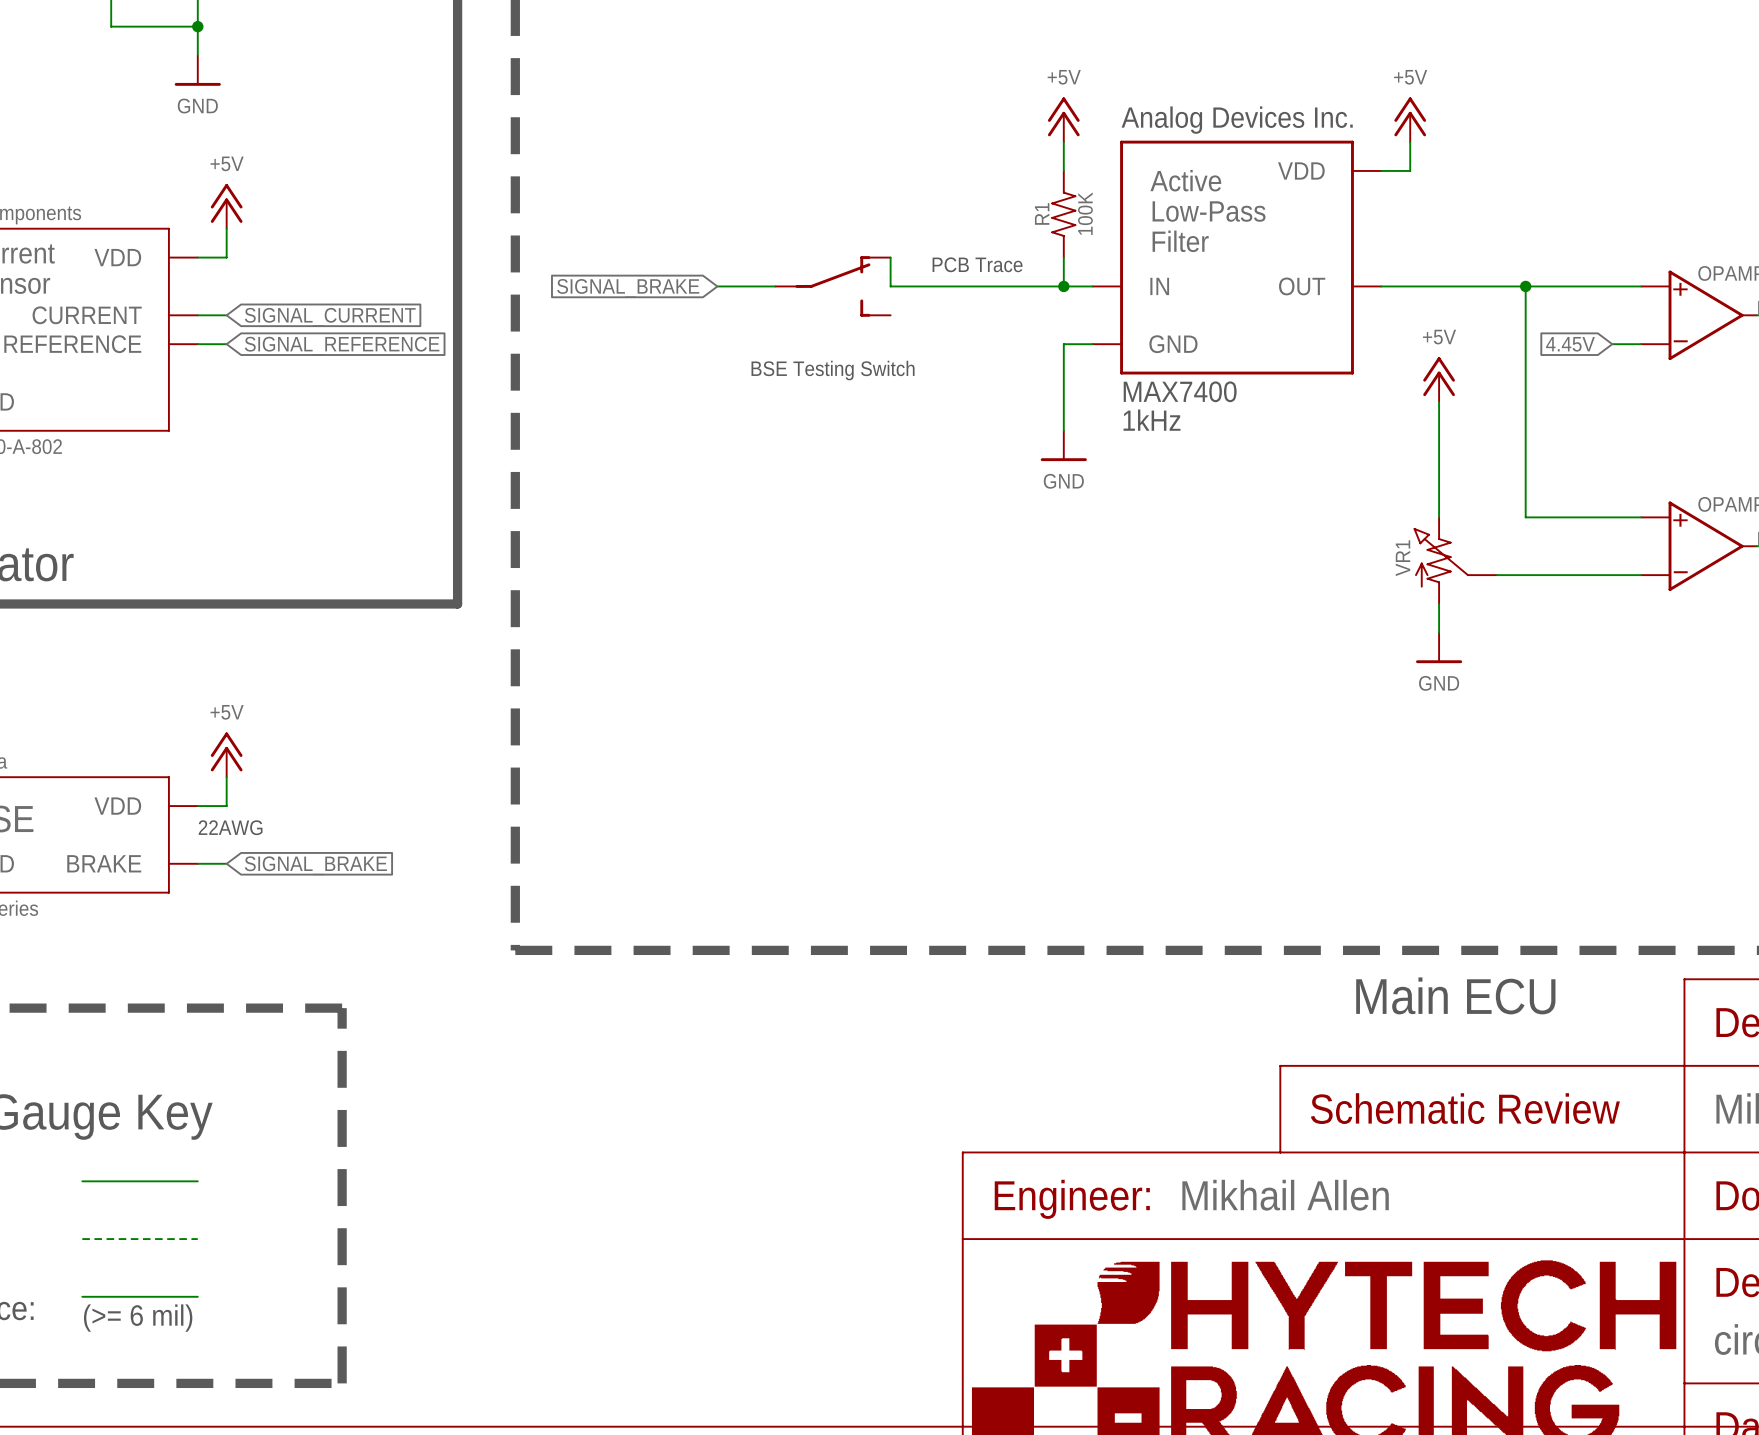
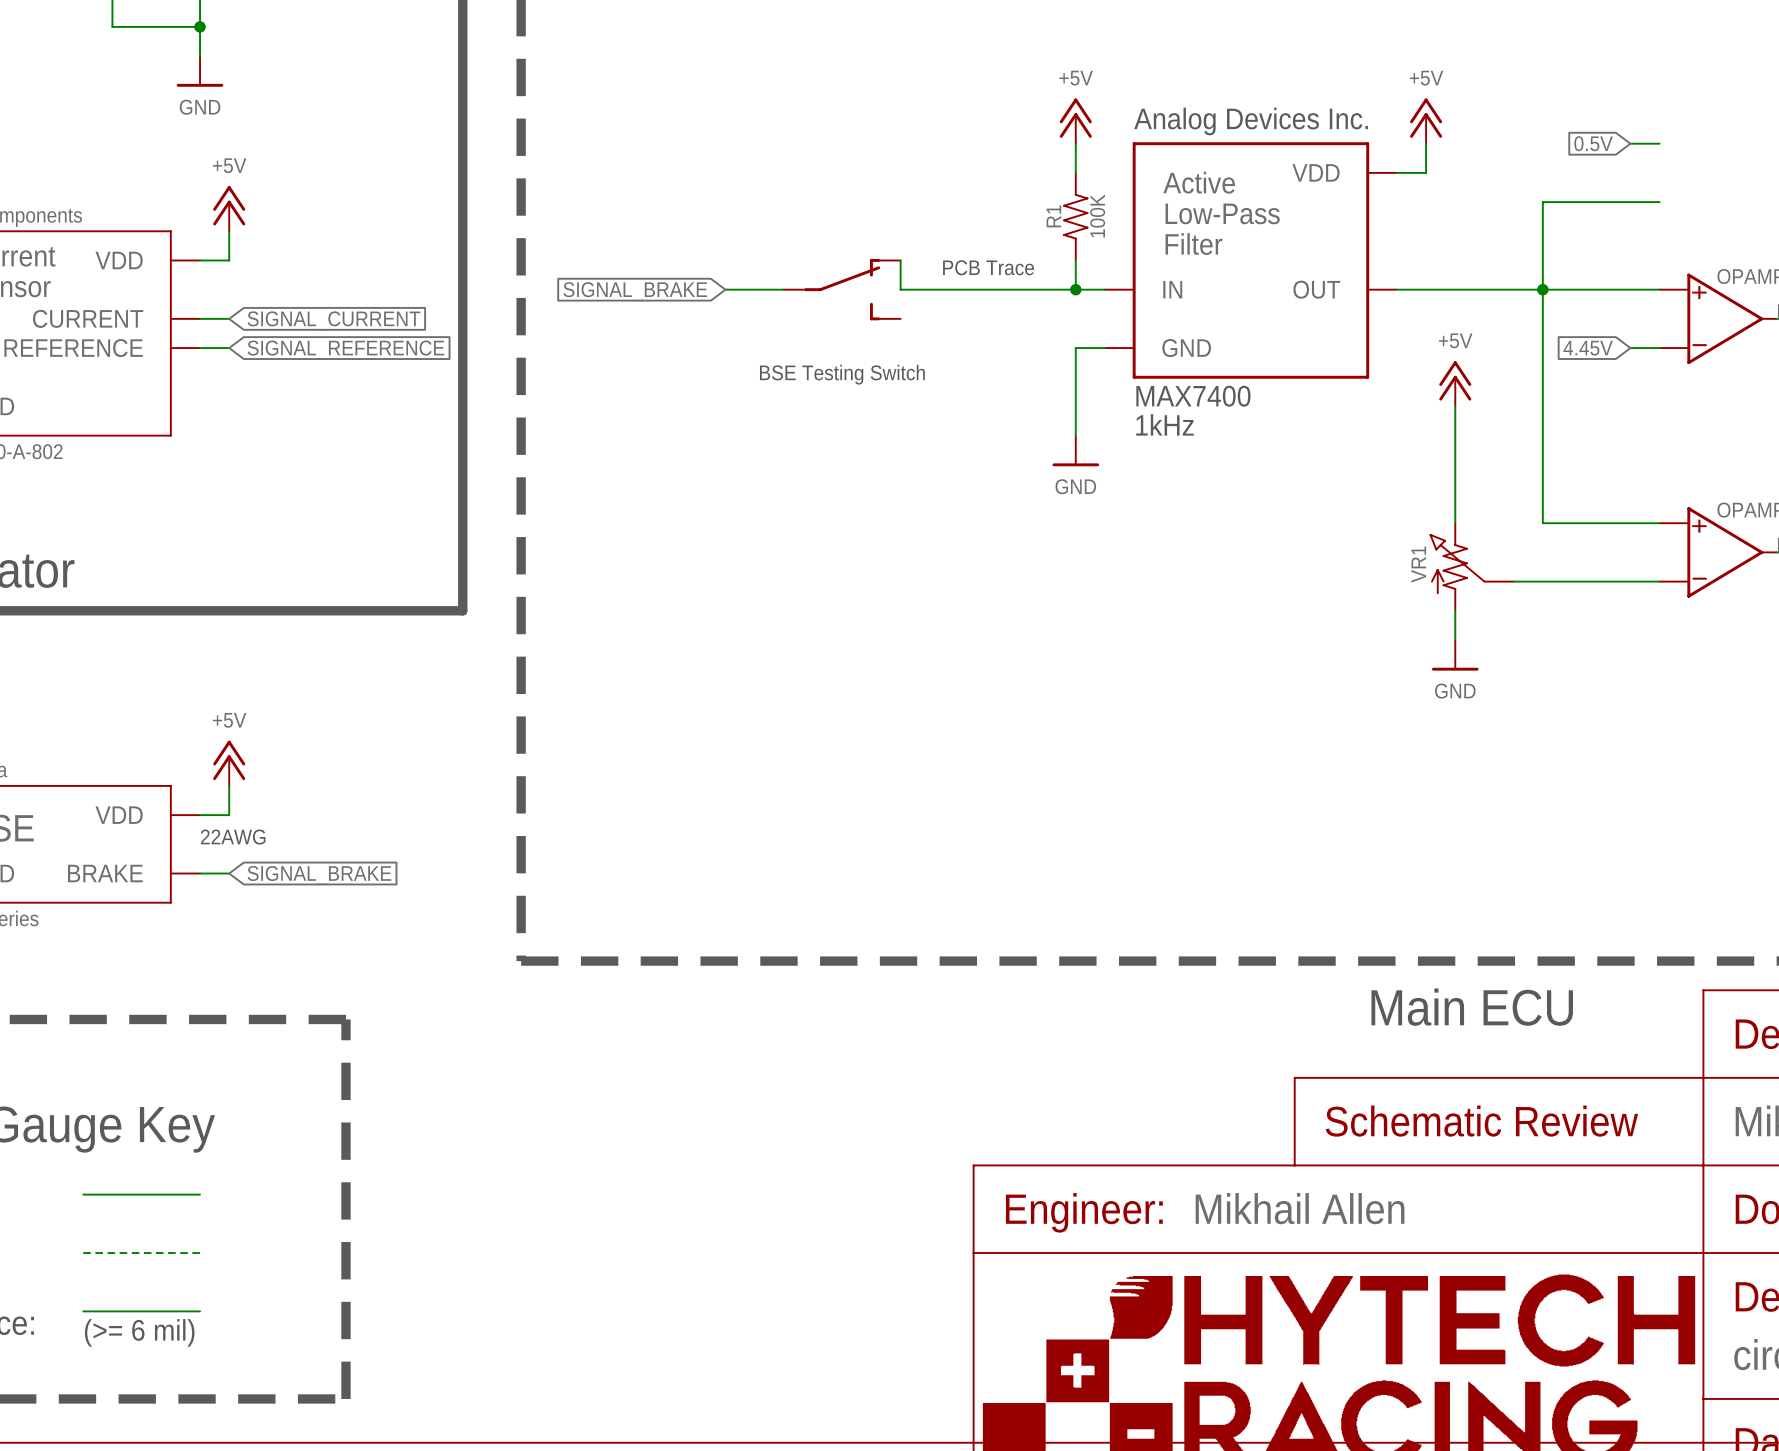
global label: none -> 0.5V (1593, 143)
wire: none -> (1630, 143) (1659, 143)
wire: none -> (1659, 202) (1542, 202) (1542, 289)

